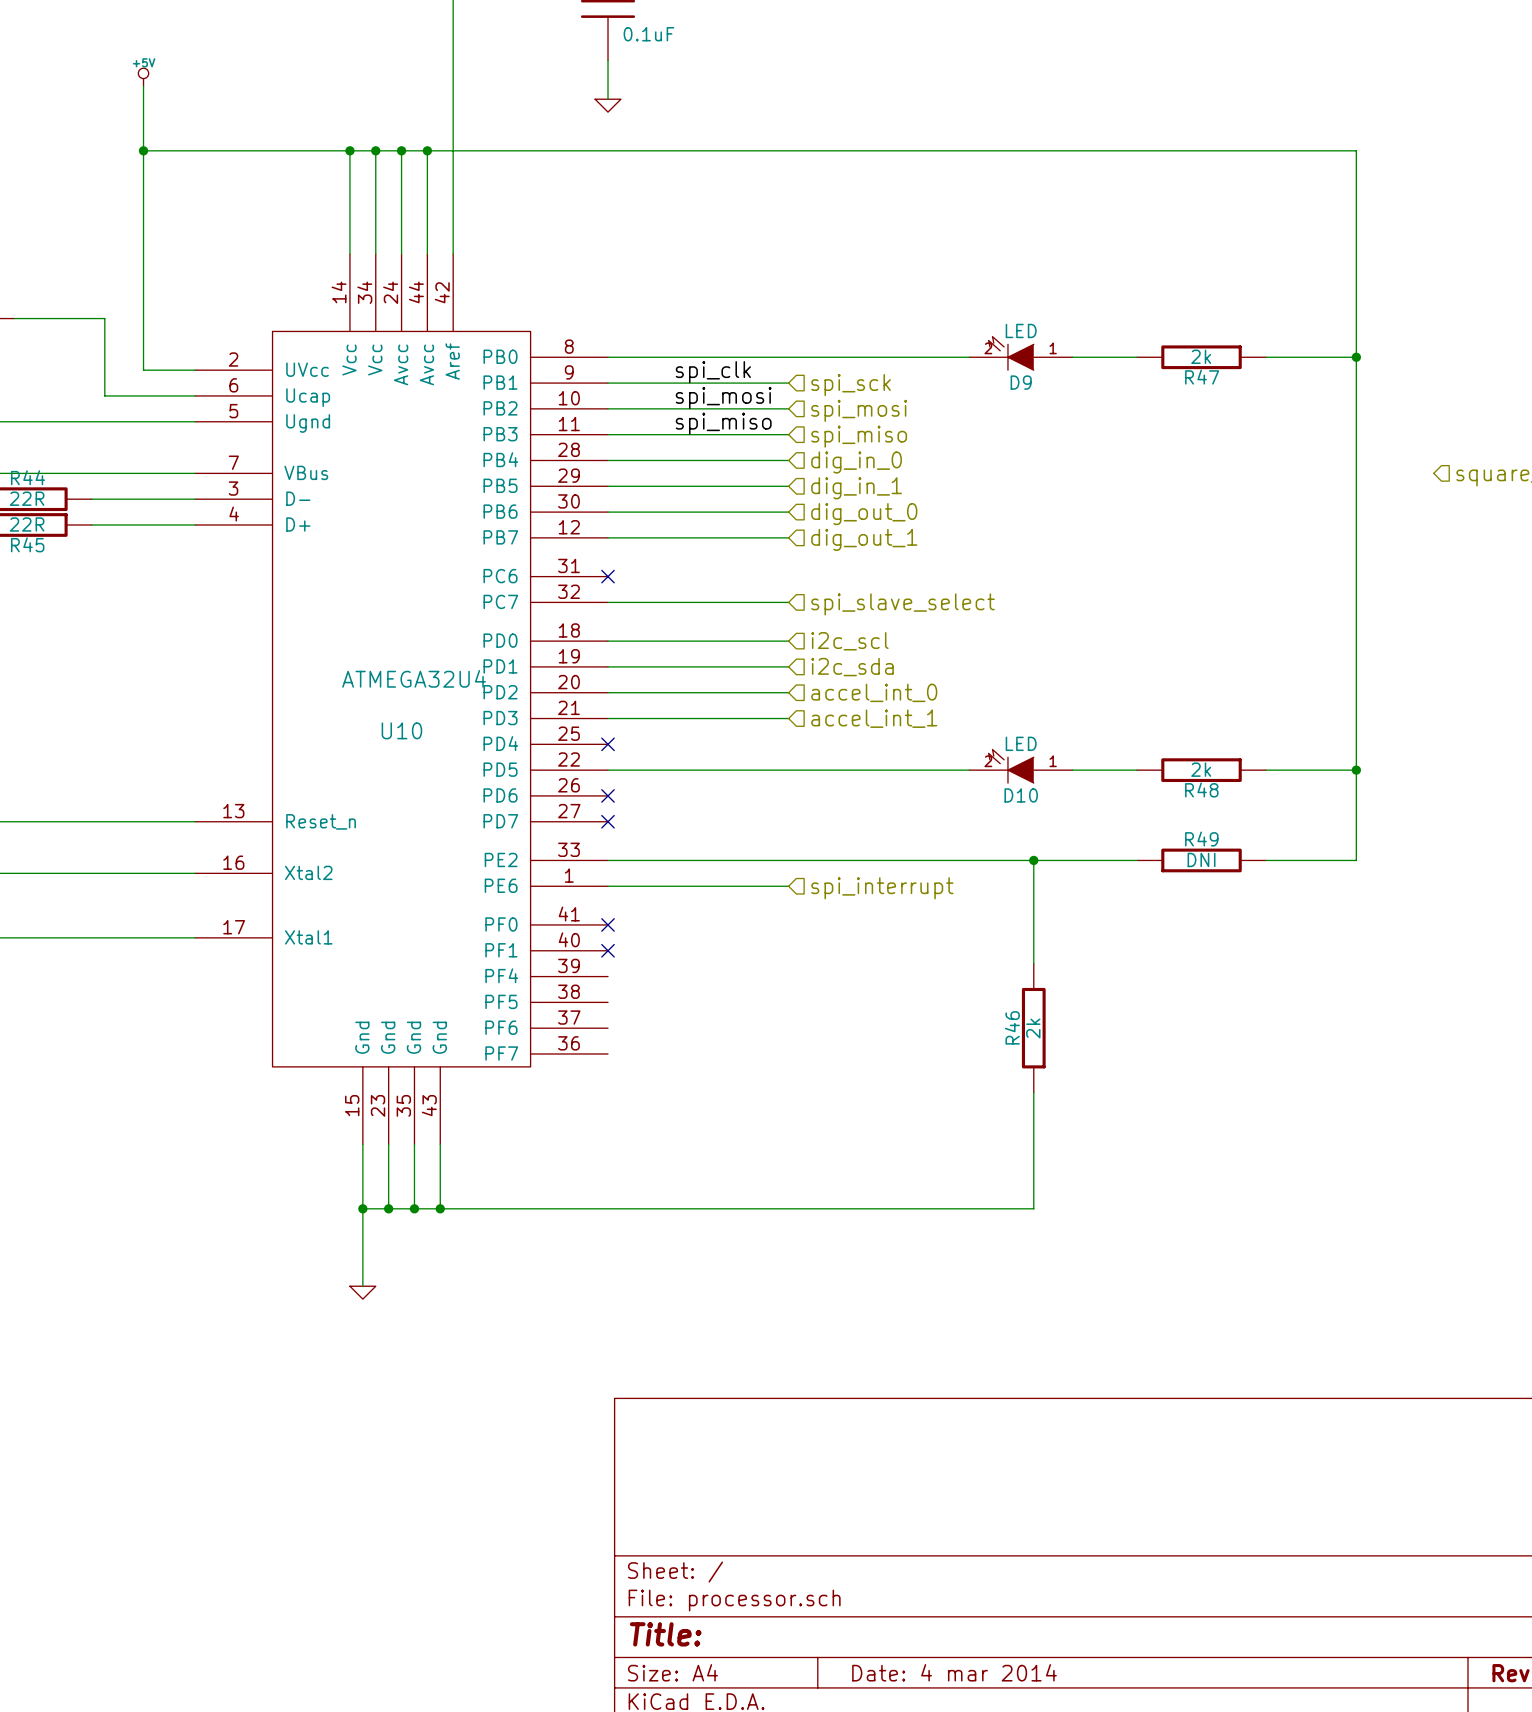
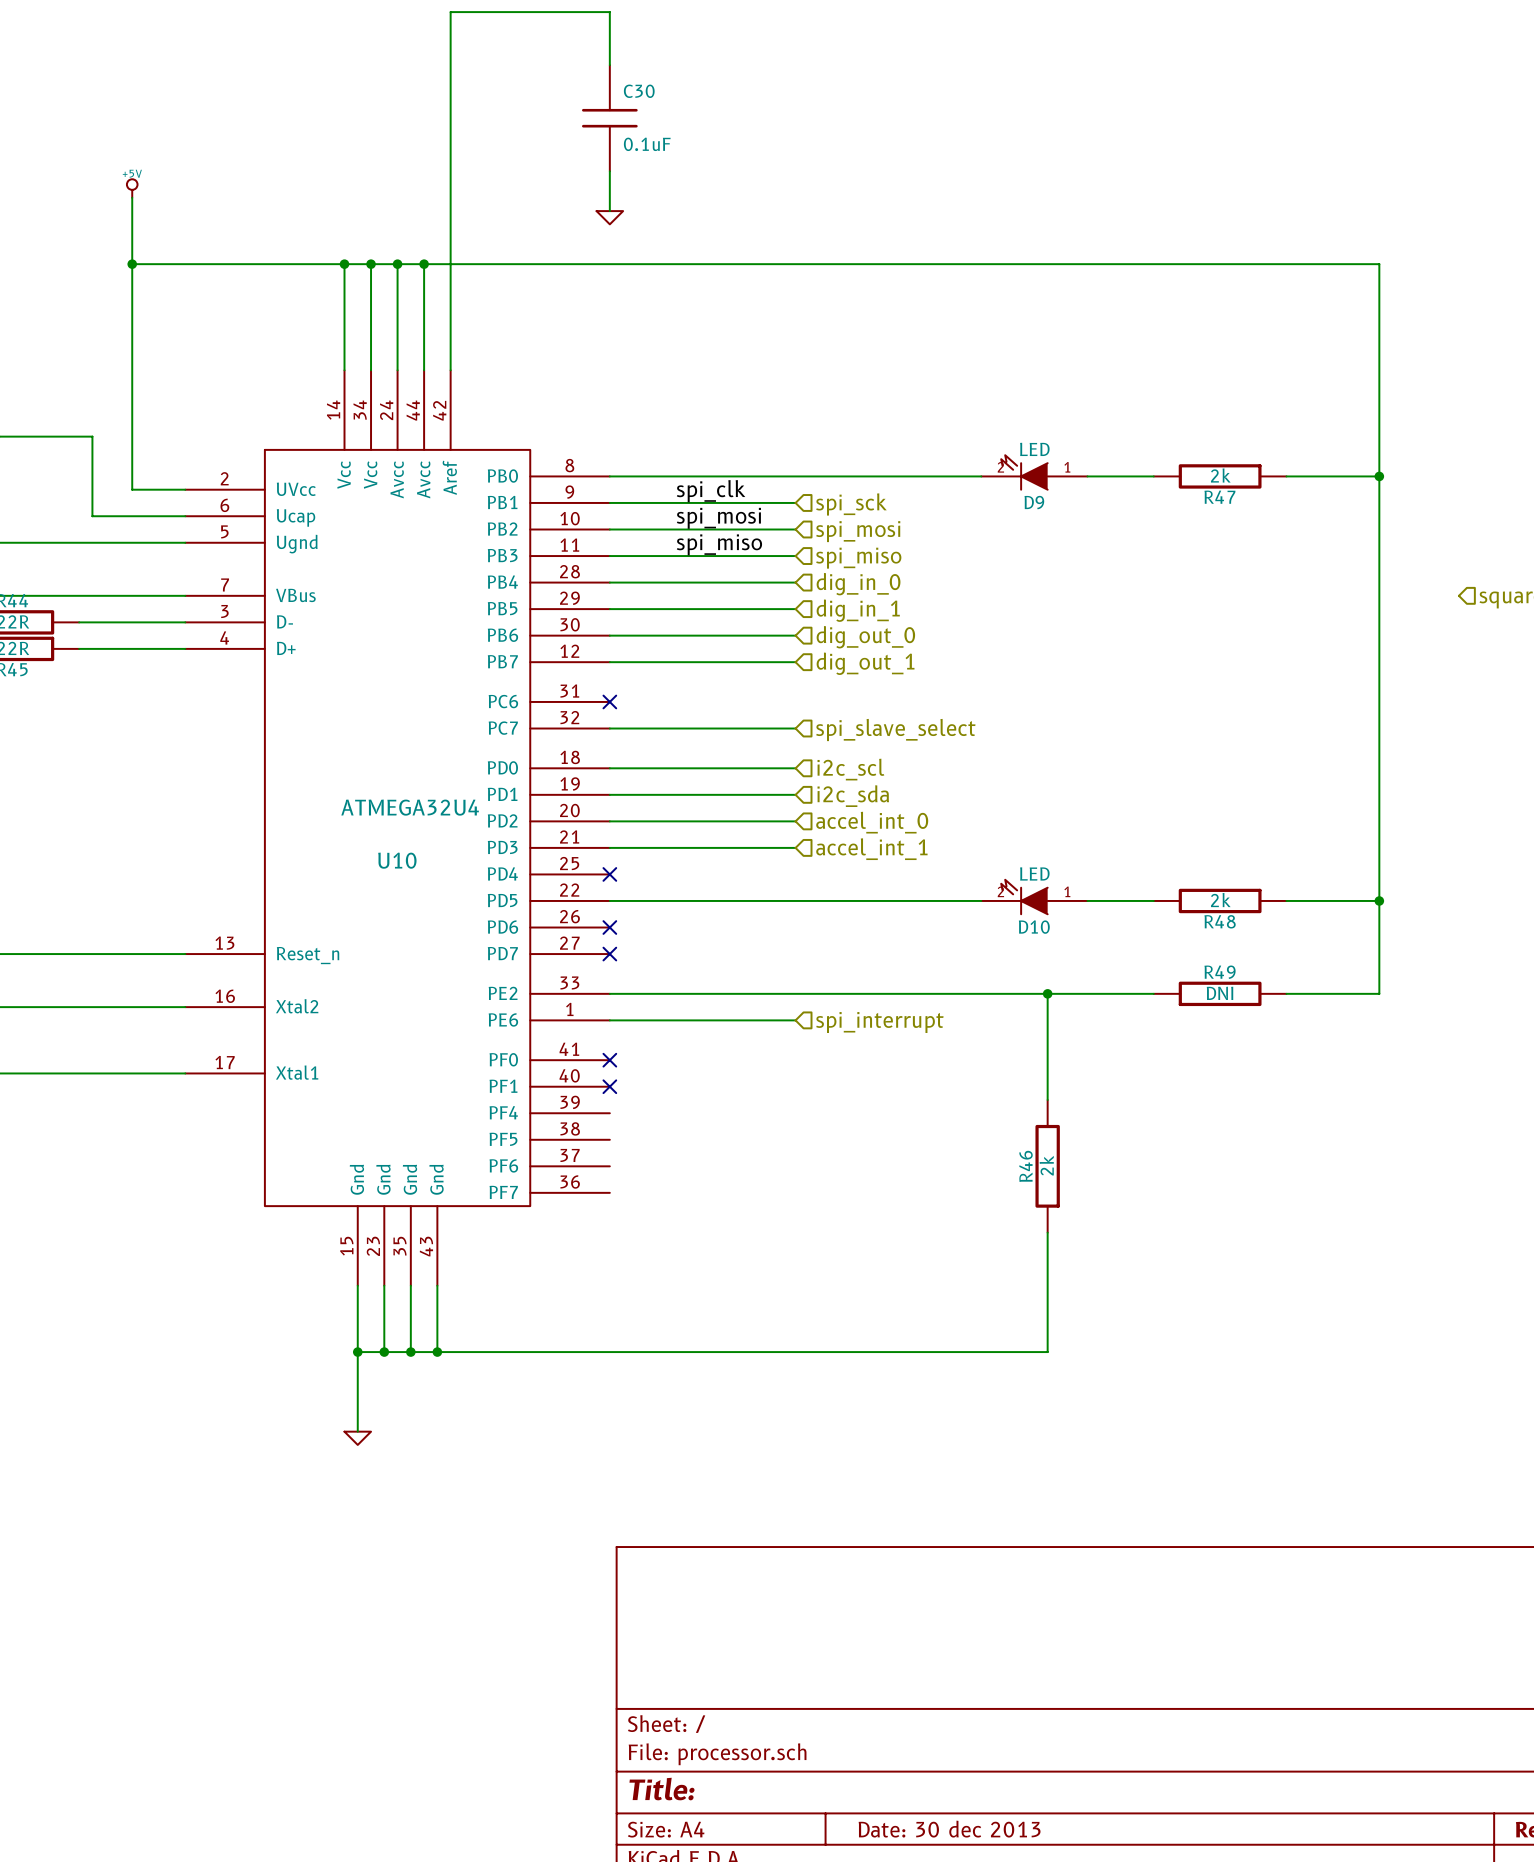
title block: Date: 4 mar 2014 (954, 1672) -> Date: 30 dec 2013 (949, 1829)

